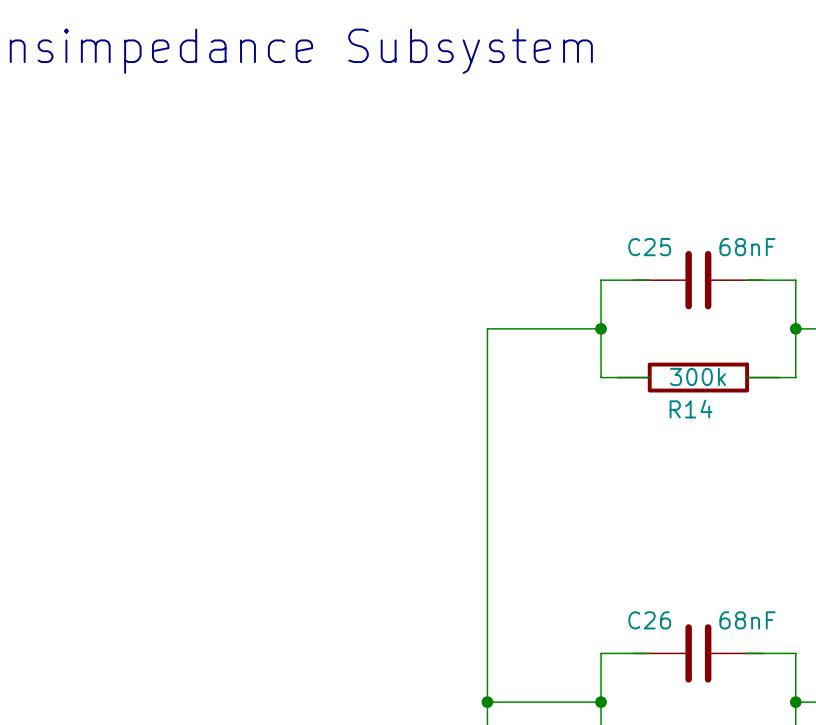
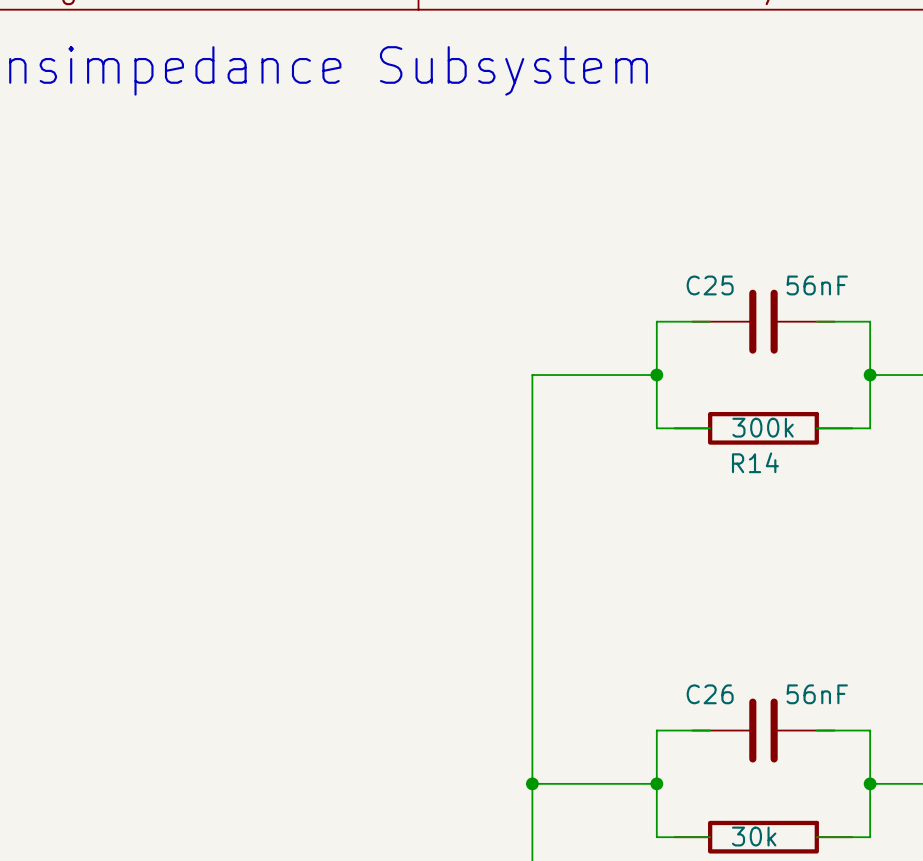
C25 value: 68nF (747, 247) -> 56nF (817, 285)
C26 value: 68nF (747, 620) -> 56nF (817, 694)

